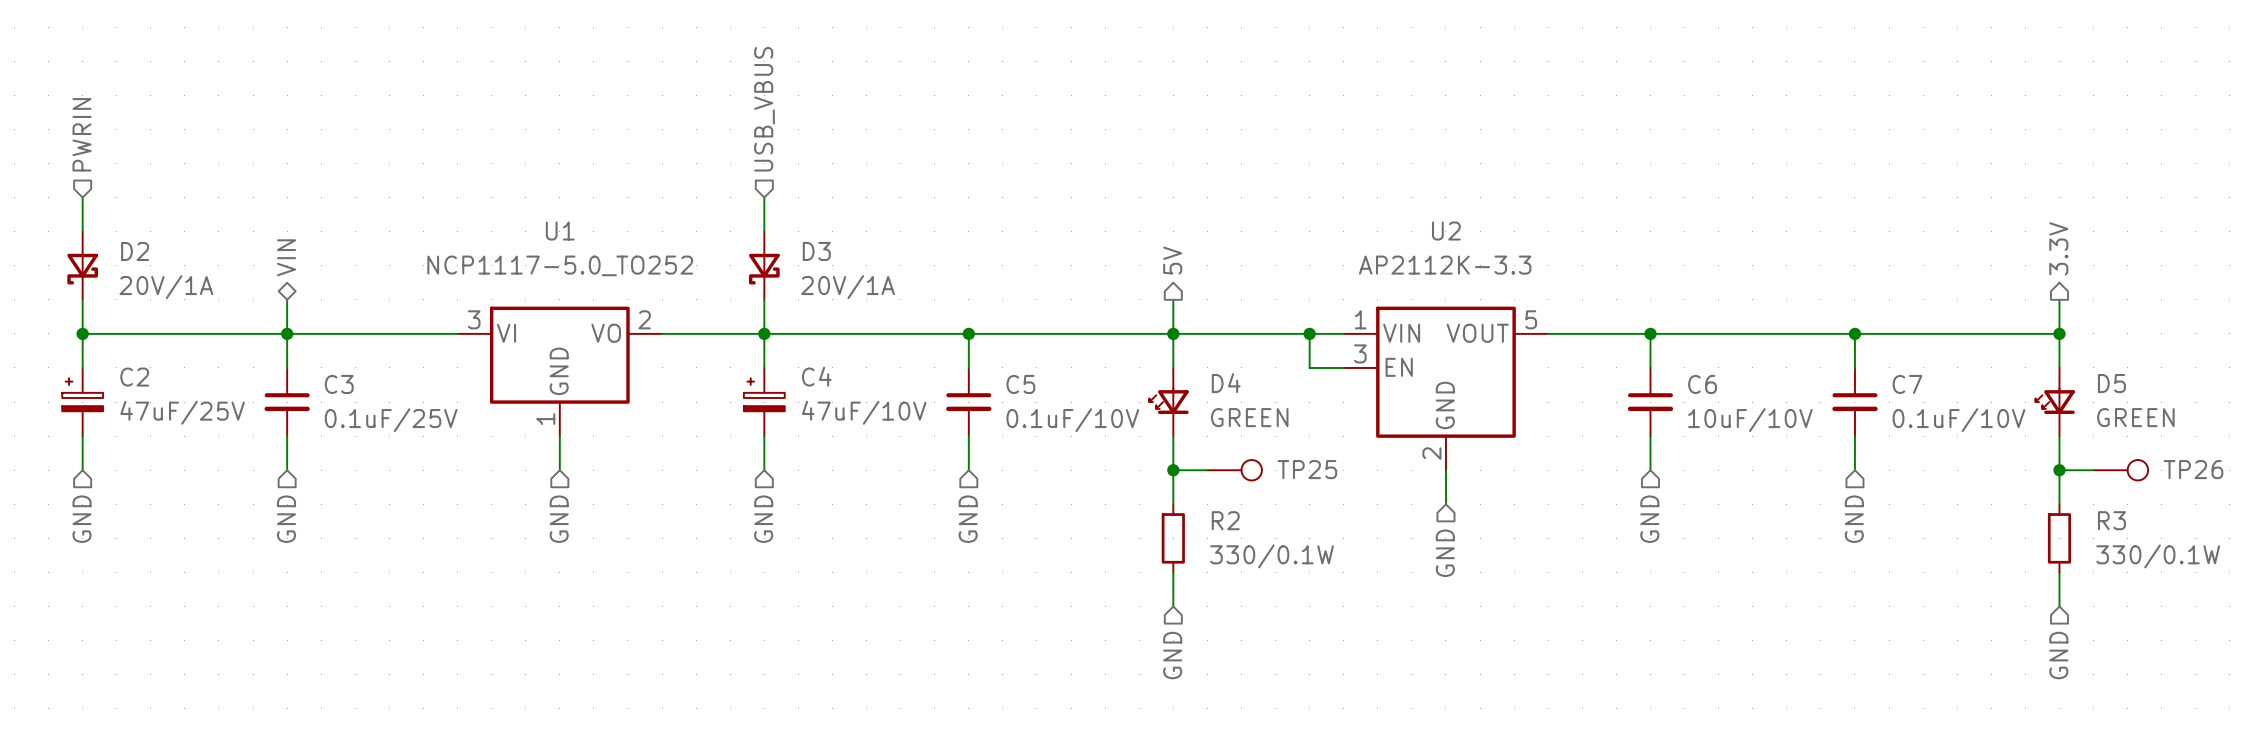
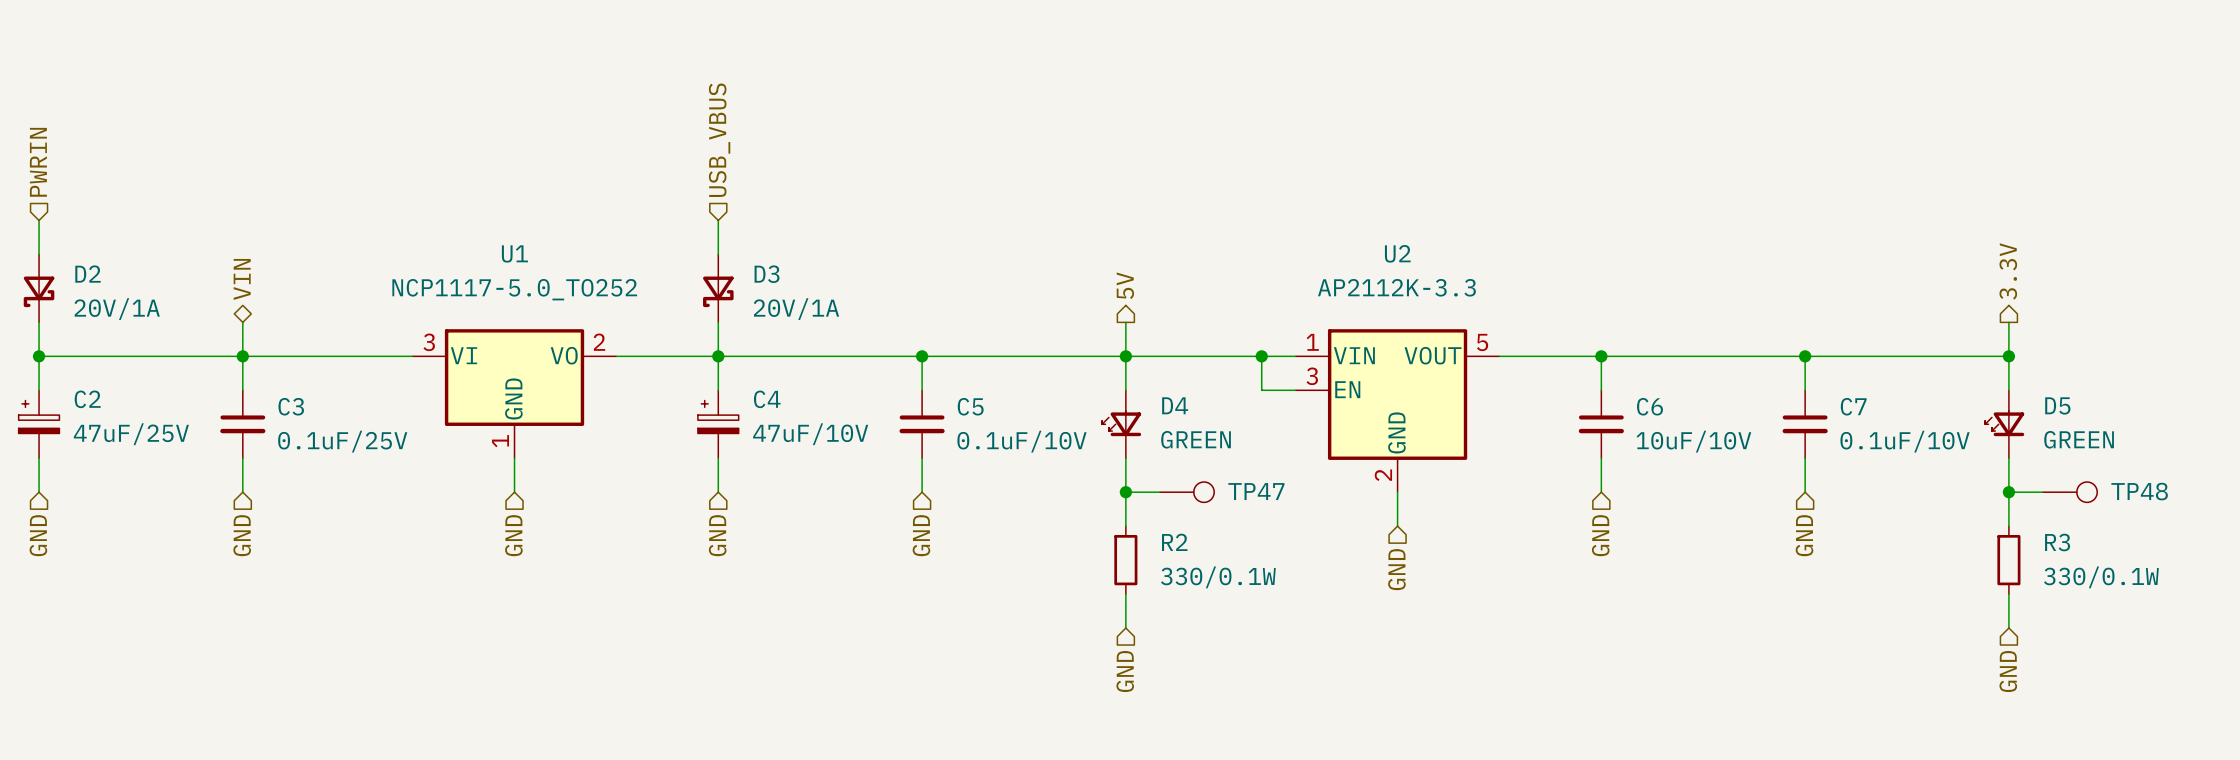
TP25 name: TP25 (1307, 469) -> TP47 (1256, 491)
TP26 name: TP26 (2193, 469) -> TP48 (2139, 491)

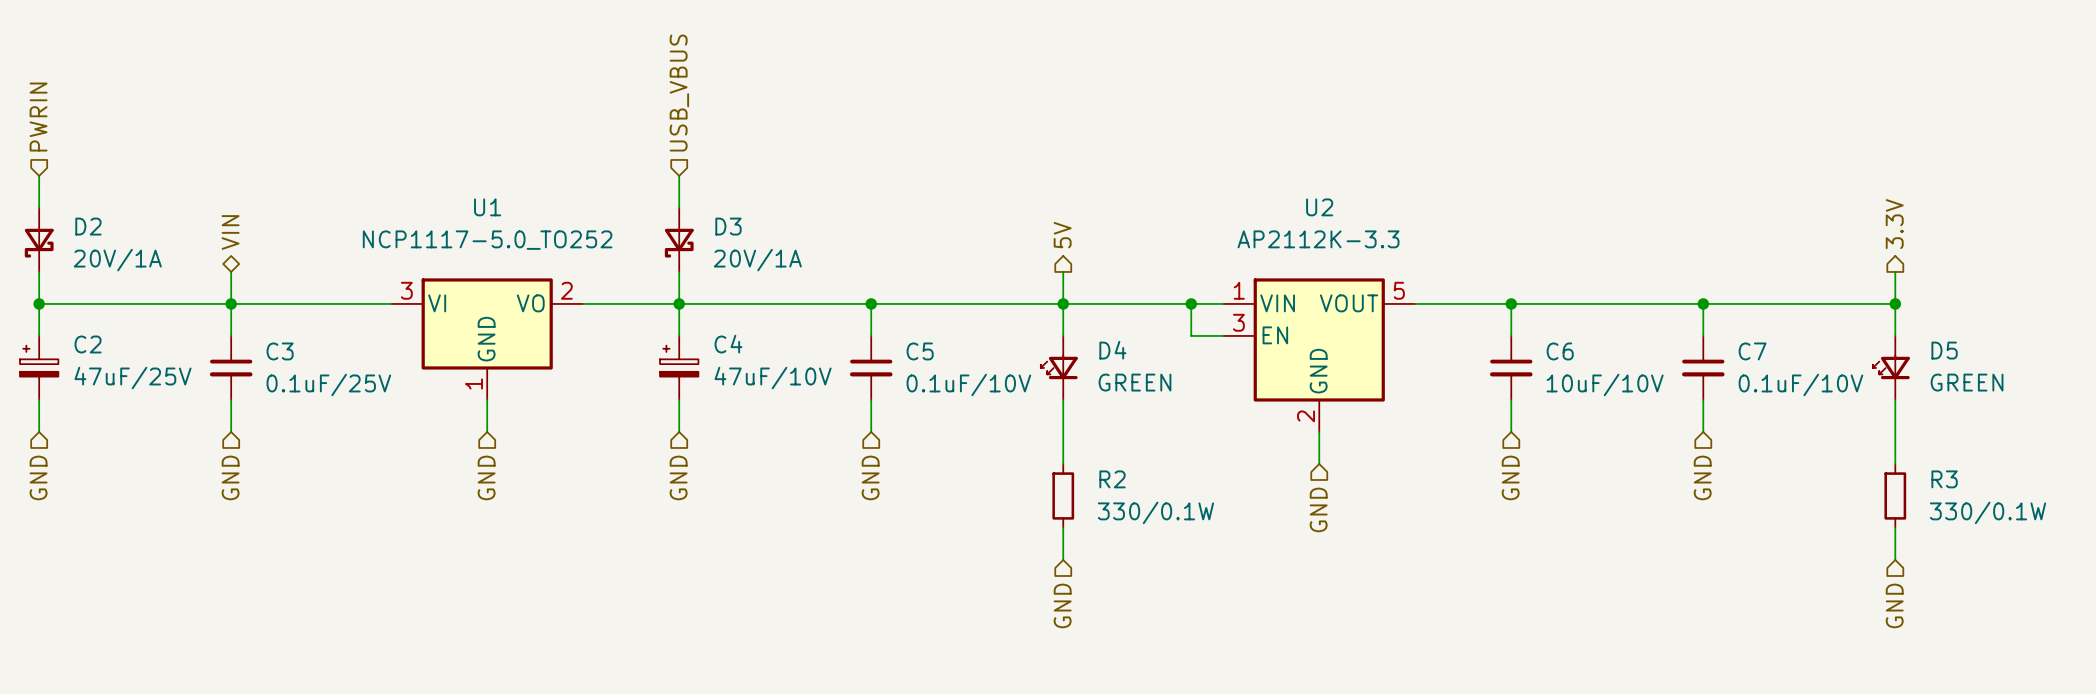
wire: (1125, 492) (1159, 492) -> none
junction: (1125, 492) -> none
TP47: (1187, 492) -> none
wire: (2008, 492) (2042, 492) -> none
junction: (2008, 492) -> none
TP48: (2070, 492) -> none

